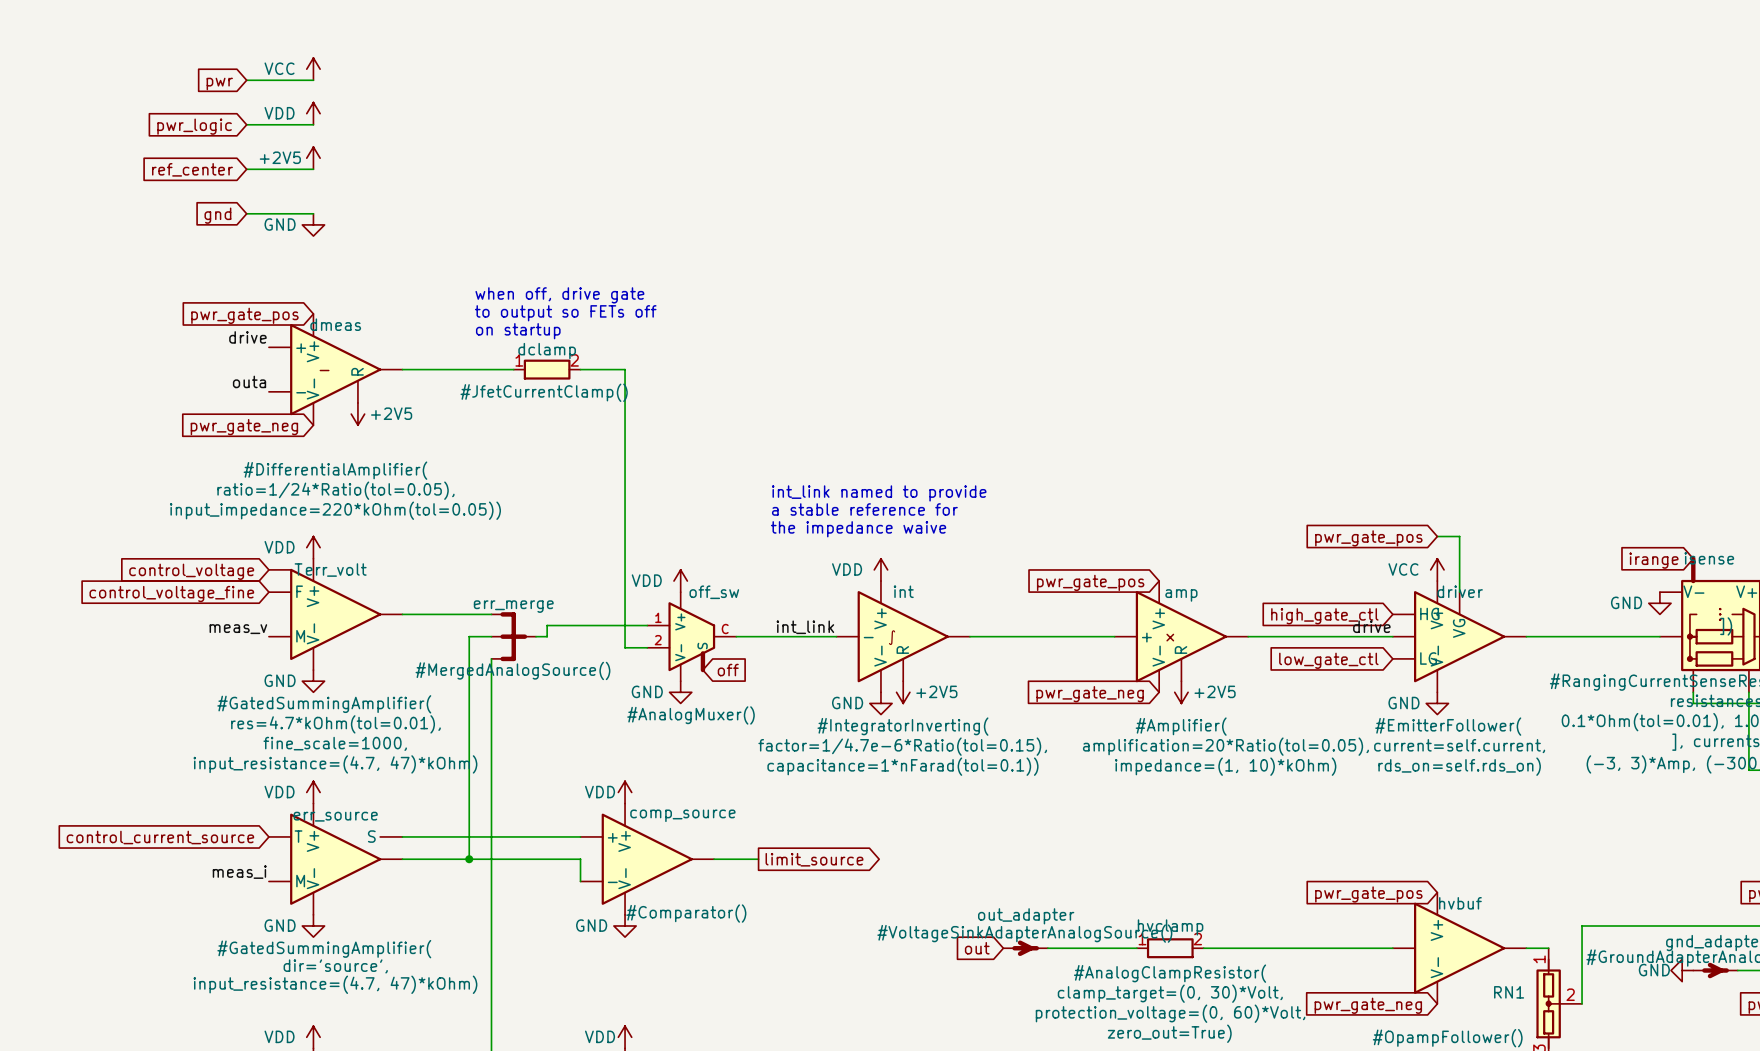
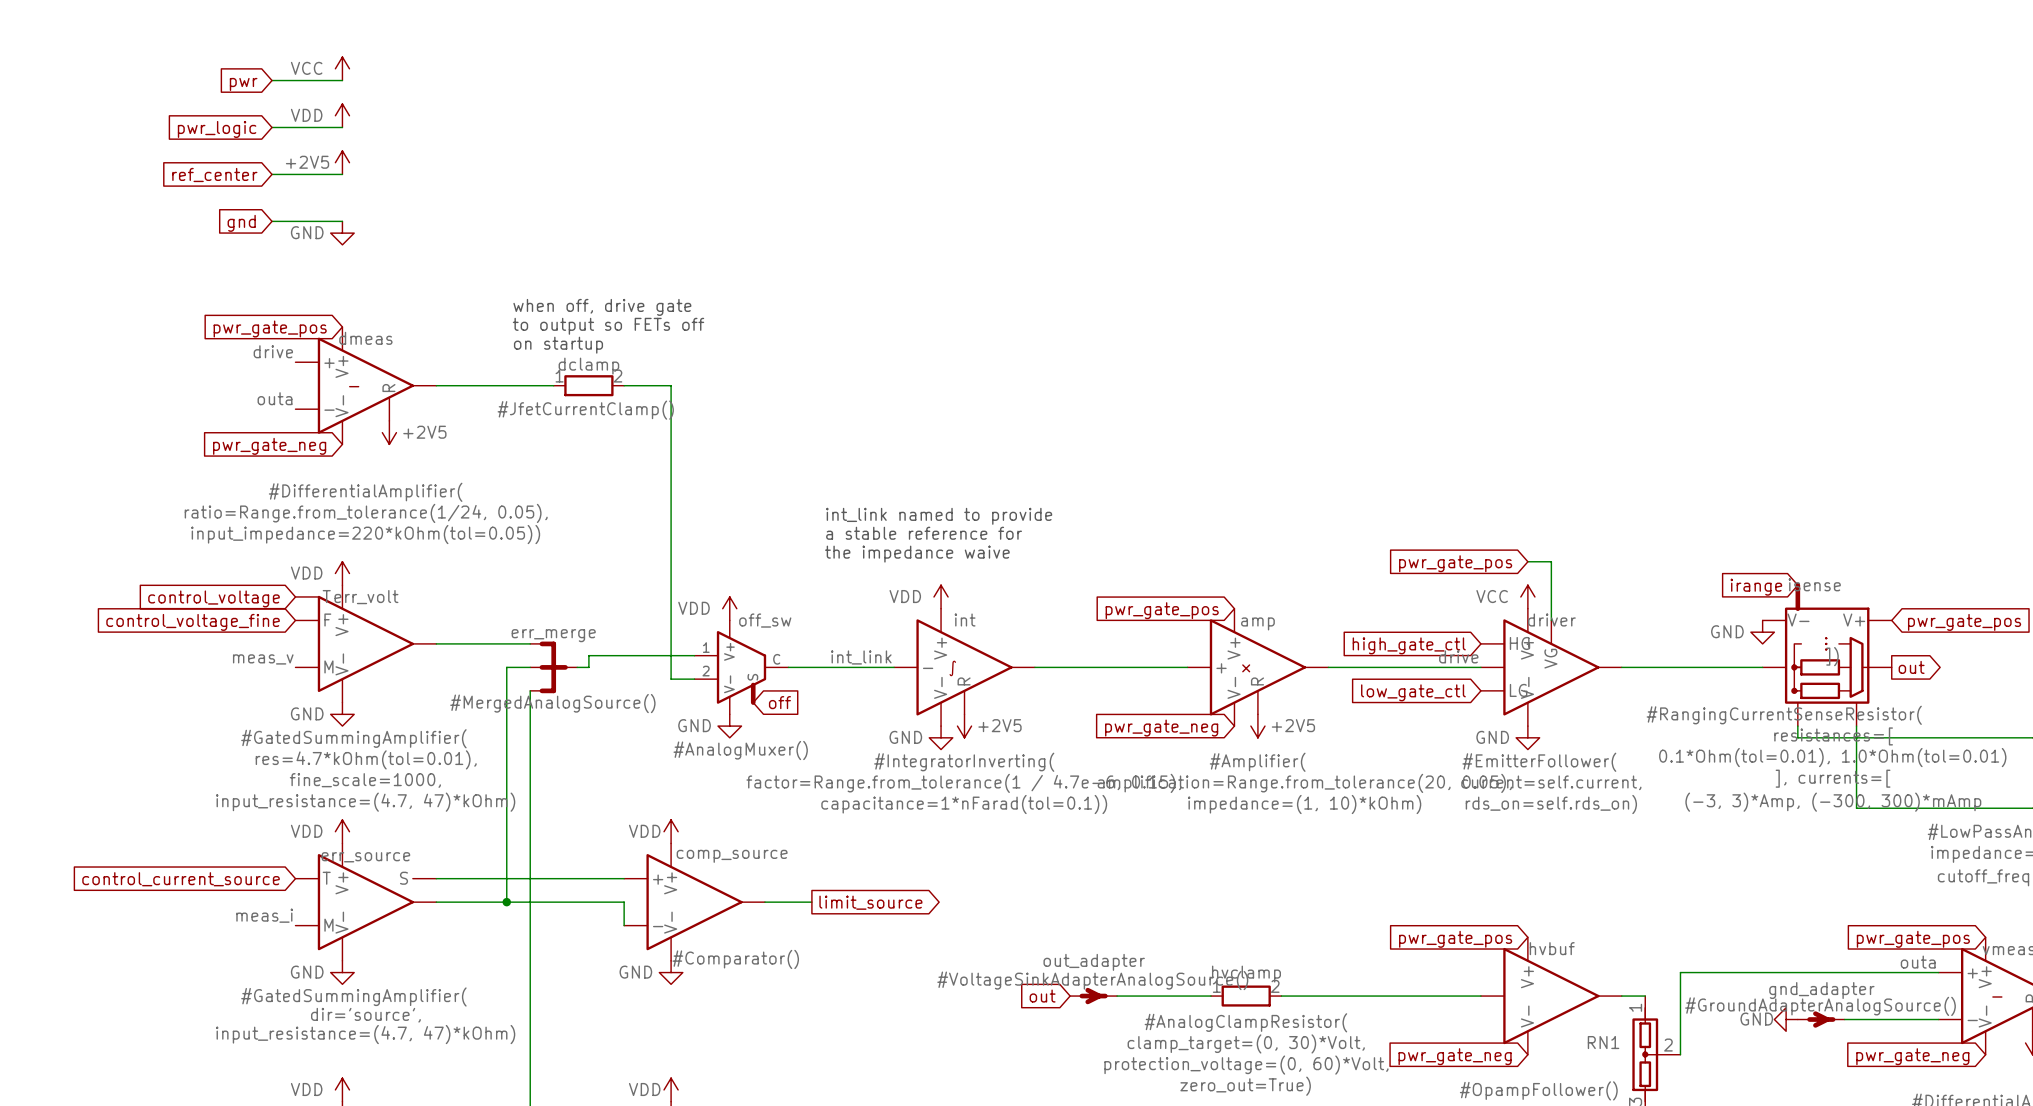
dmeas text: ratio=1/24*Ratio(tol=0.05), (335, 490) -> ratio=Range.from_tolerance(1/24, 0.05), (366, 513)
int text: factor=1/4.7e-6*Ratio(tol=0.15), (902, 746) -> factor=Range.from_tolerance(1 / 4.7e-6, 0.15), (963, 783)
amp text: amplification=20*Ratio(tol=0.05), (1225, 746) -> amplification=Range.from_tolerance(20, 0.05), (1304, 783)

